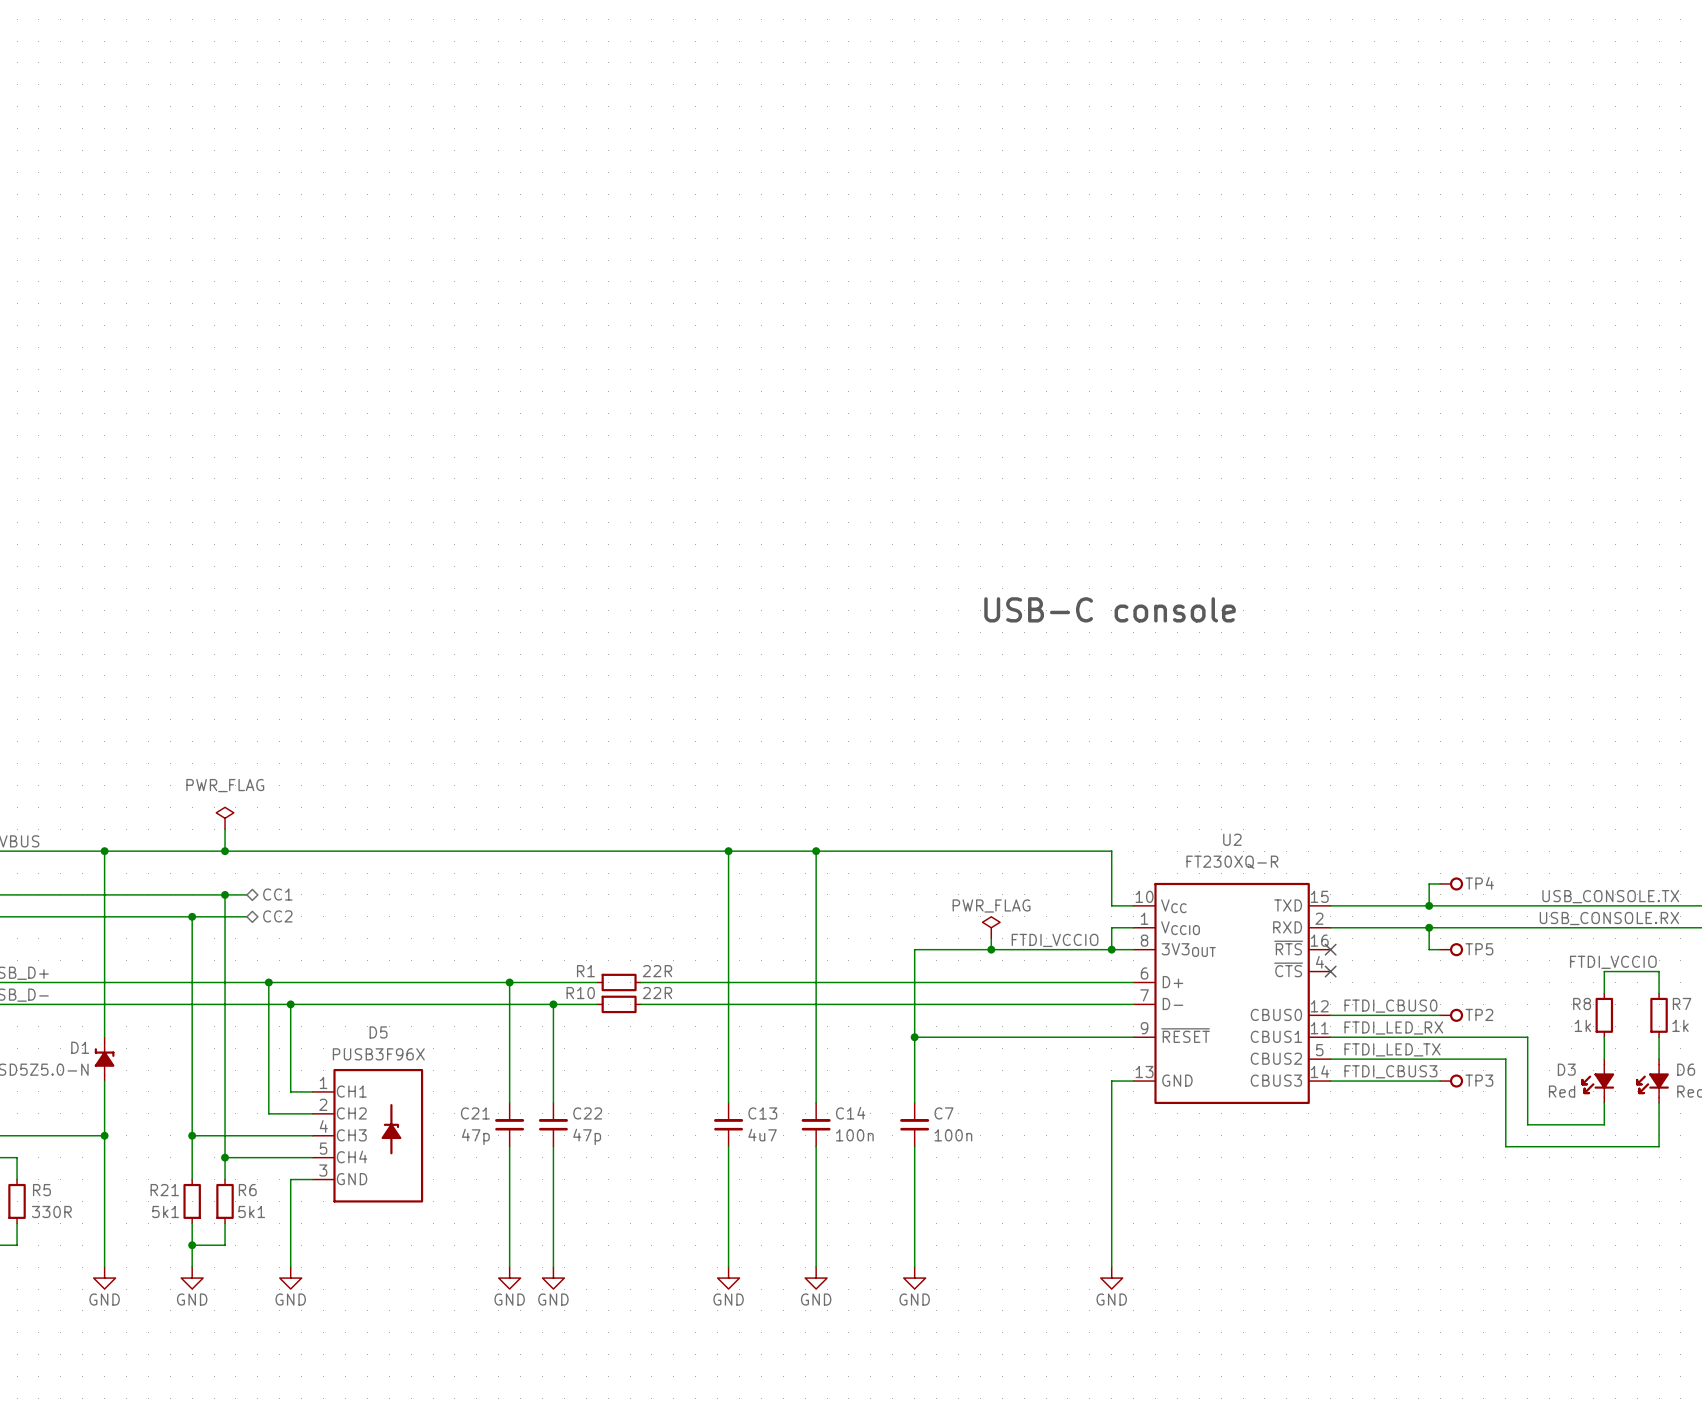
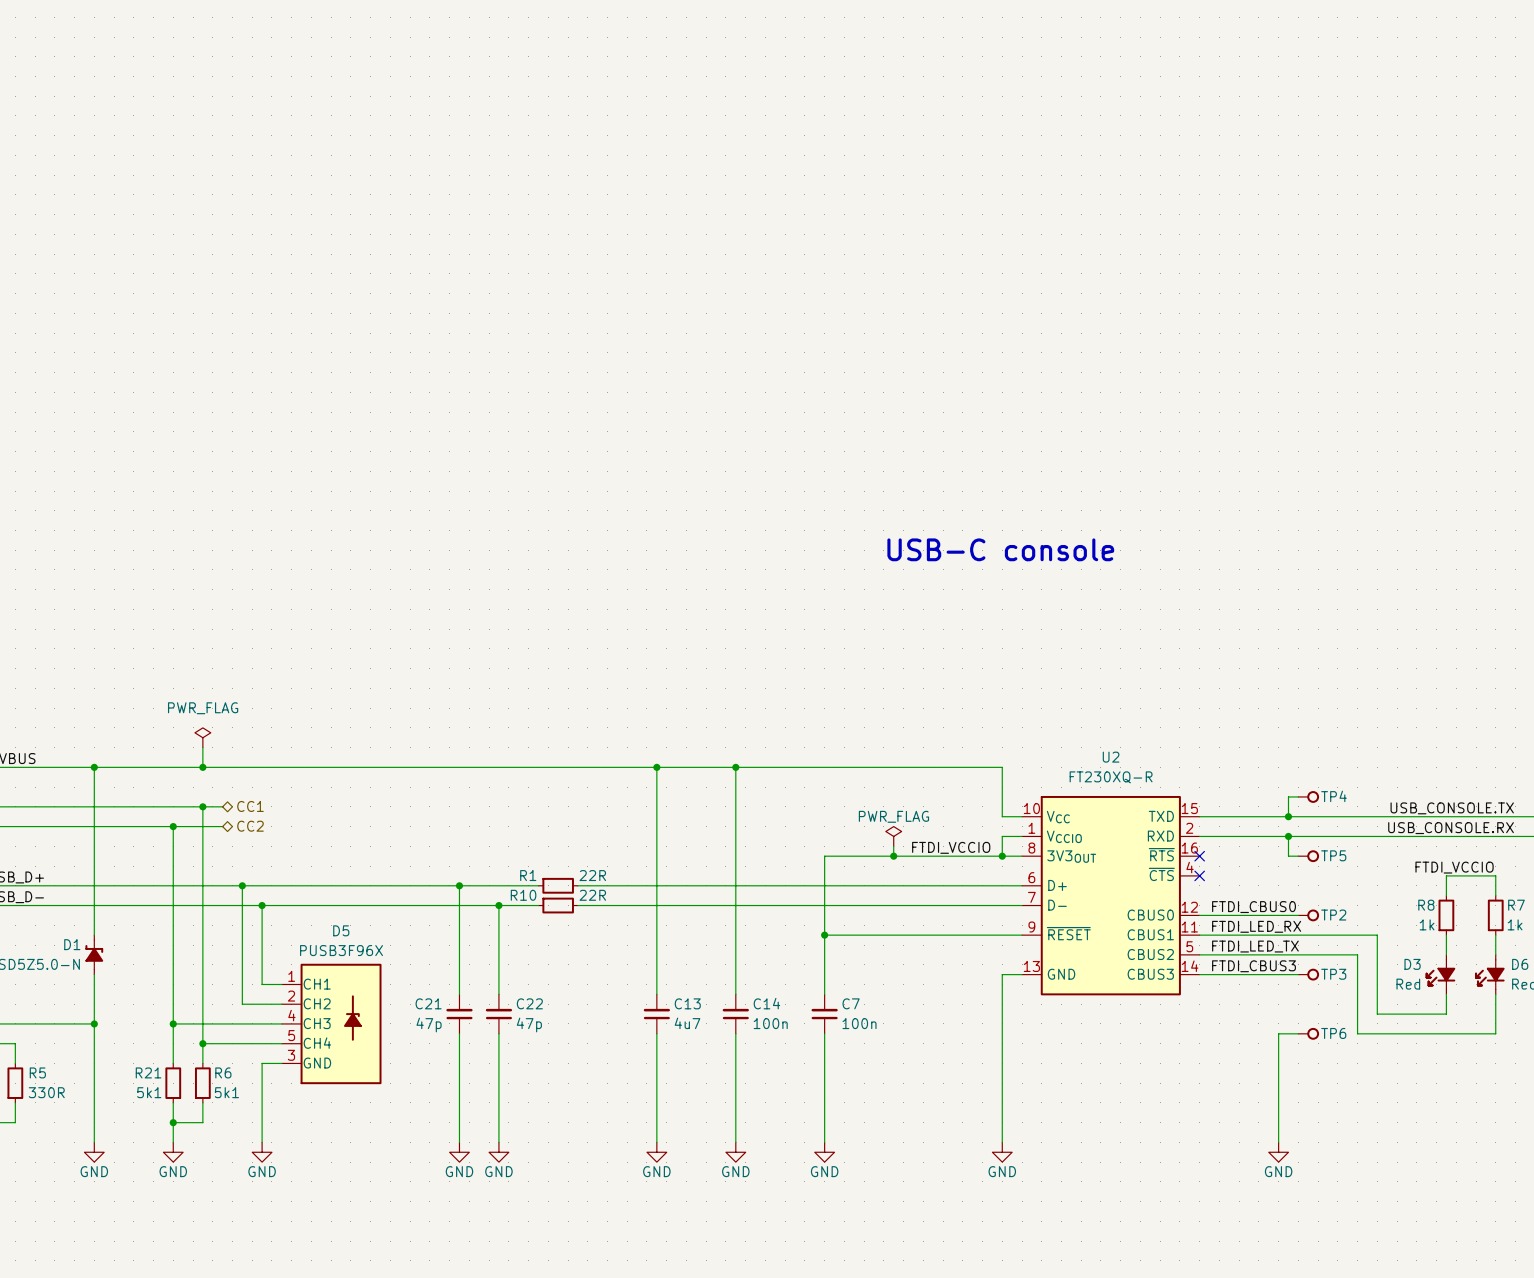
wire: none -> (1298, 1033) (1278, 1033) (1278, 1142)
TP6: none -> (1308, 1033)
power symbol: none -> GND (1278, 1152)

